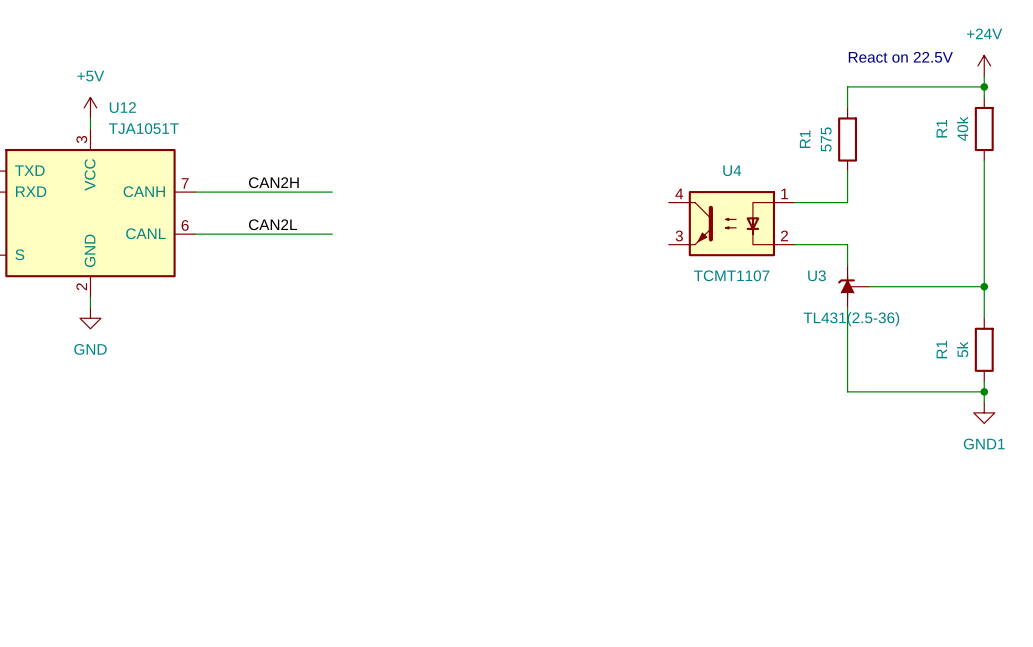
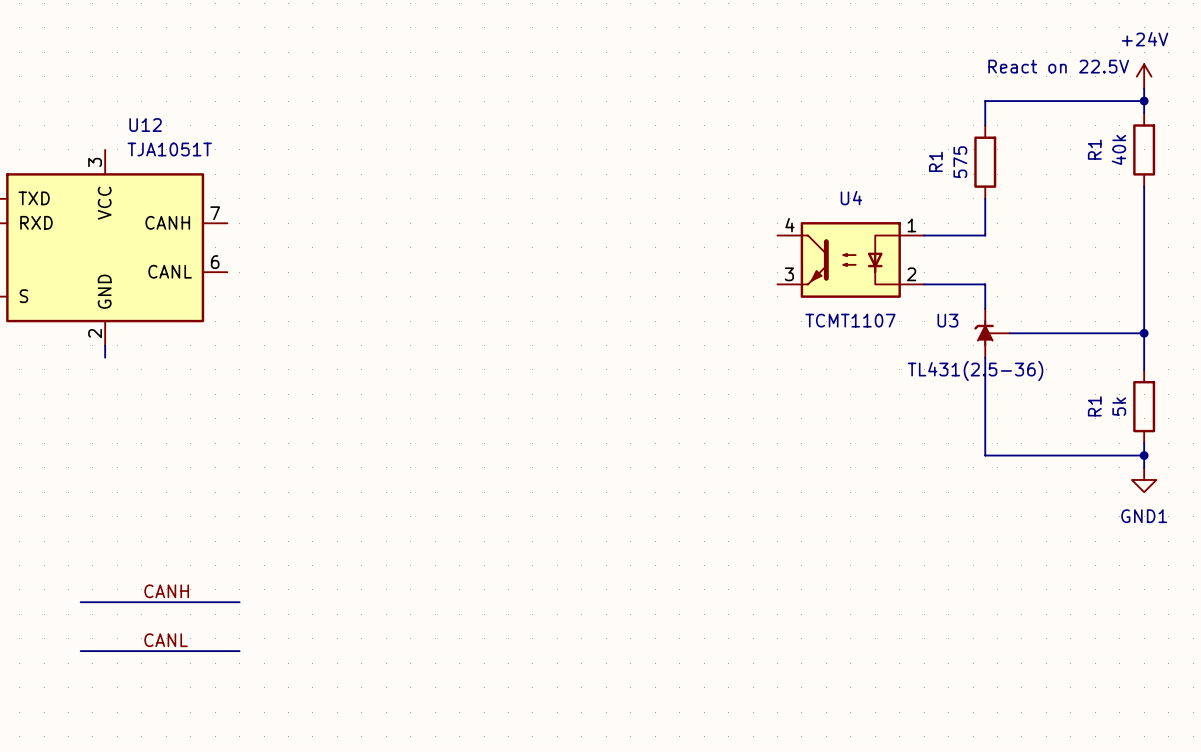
power symbol: +5V (90, 107) -> none
wire: (90, 118) (90, 128) -> none
label: CAN2H (273, 182) -> none
wire: (195, 192) (332, 192) -> none
label: CAN2L (272, 224) -> none
wire: (195, 234) (332, 234) -> none
power symbol: GND (90, 318) -> none
label: none -> CANH (166, 591)
wire: none -> (80, 602) (239, 602)
label: none -> CANL (166, 640)
wire: none -> (80, 651) (239, 651)

